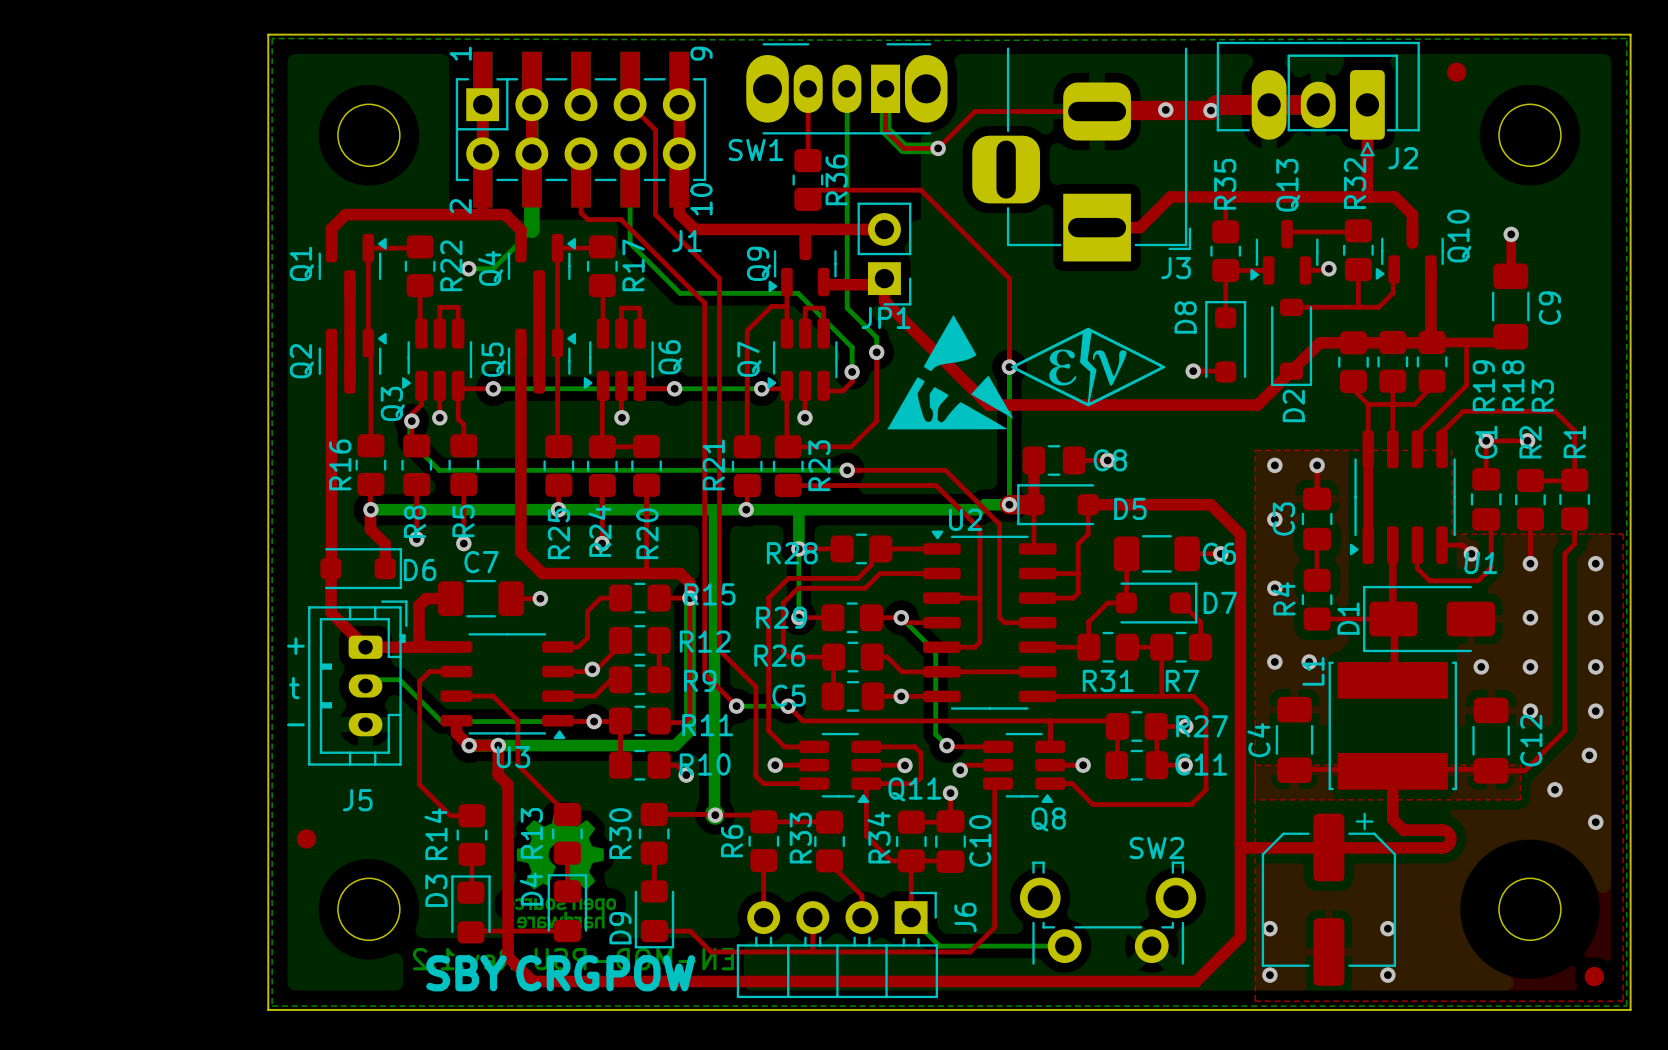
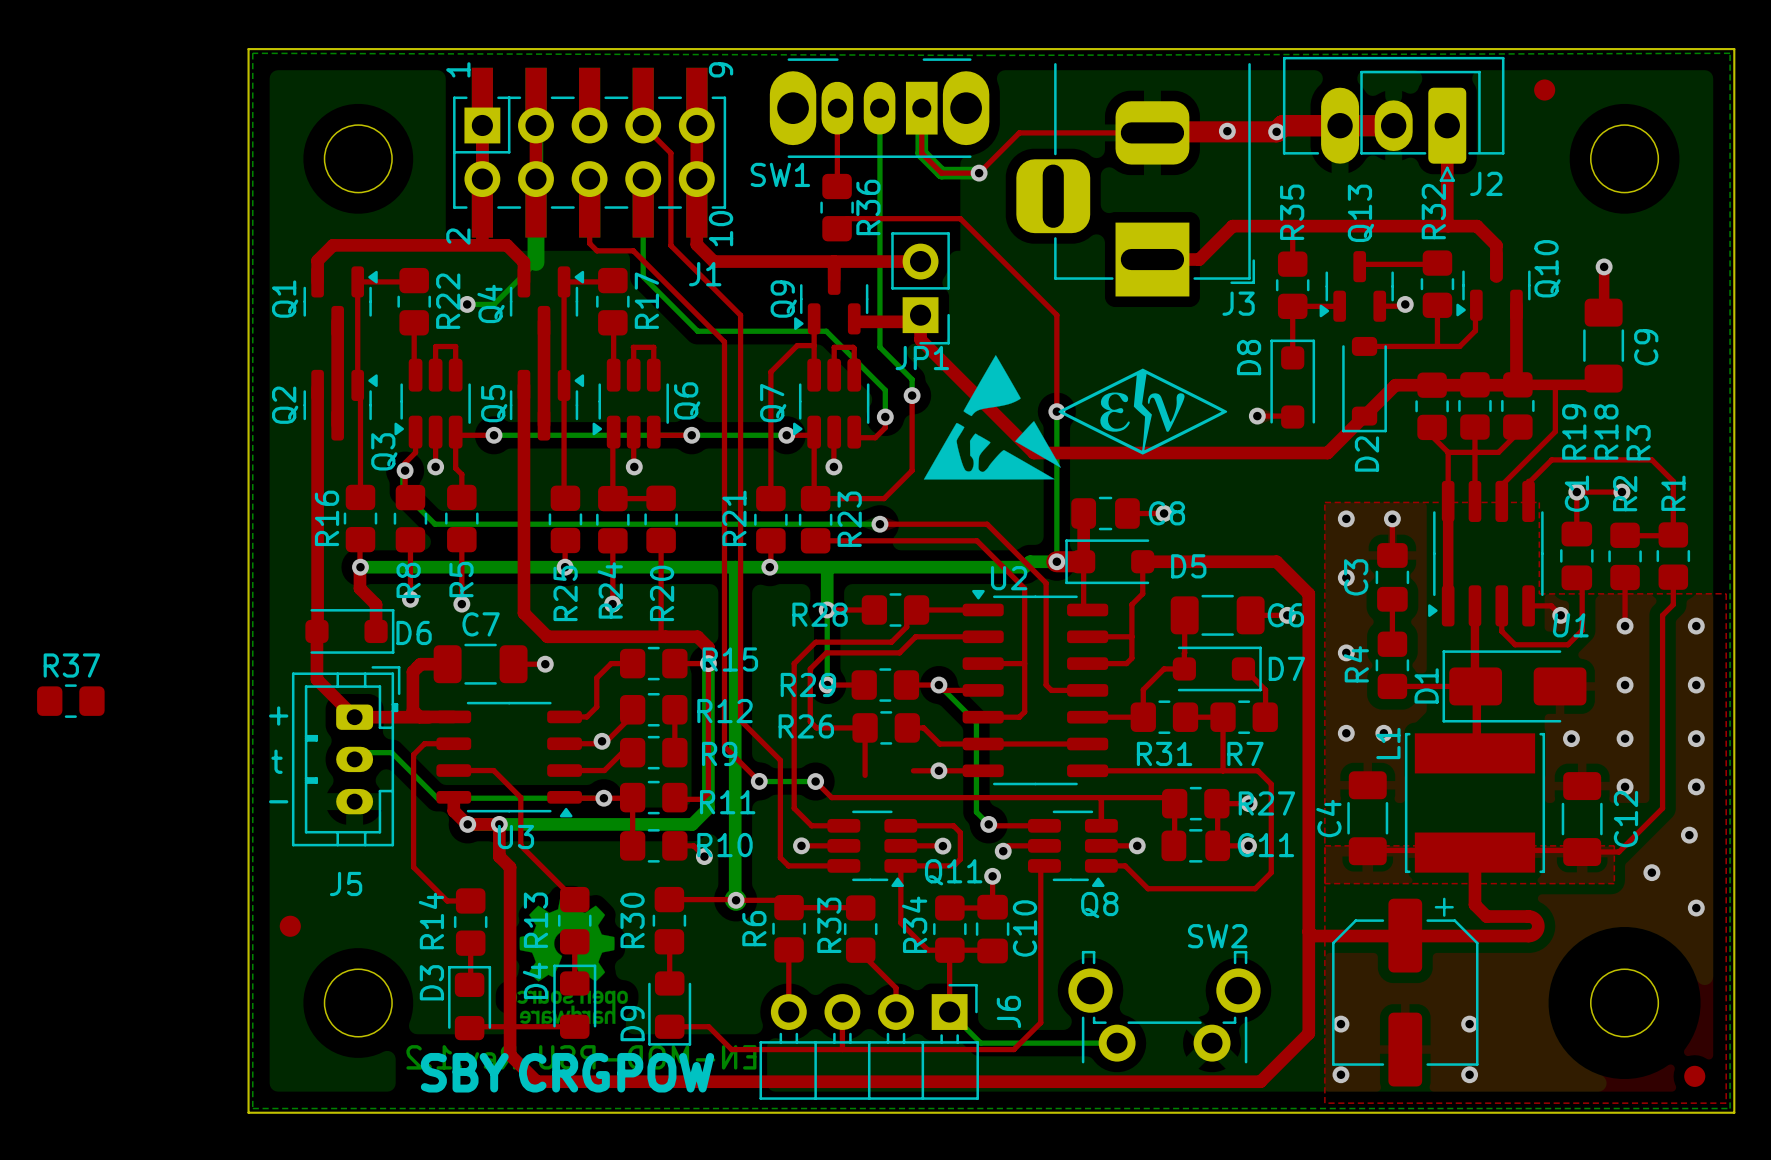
R37: none -> (70, 701)
C5: (852, 696) -> none

